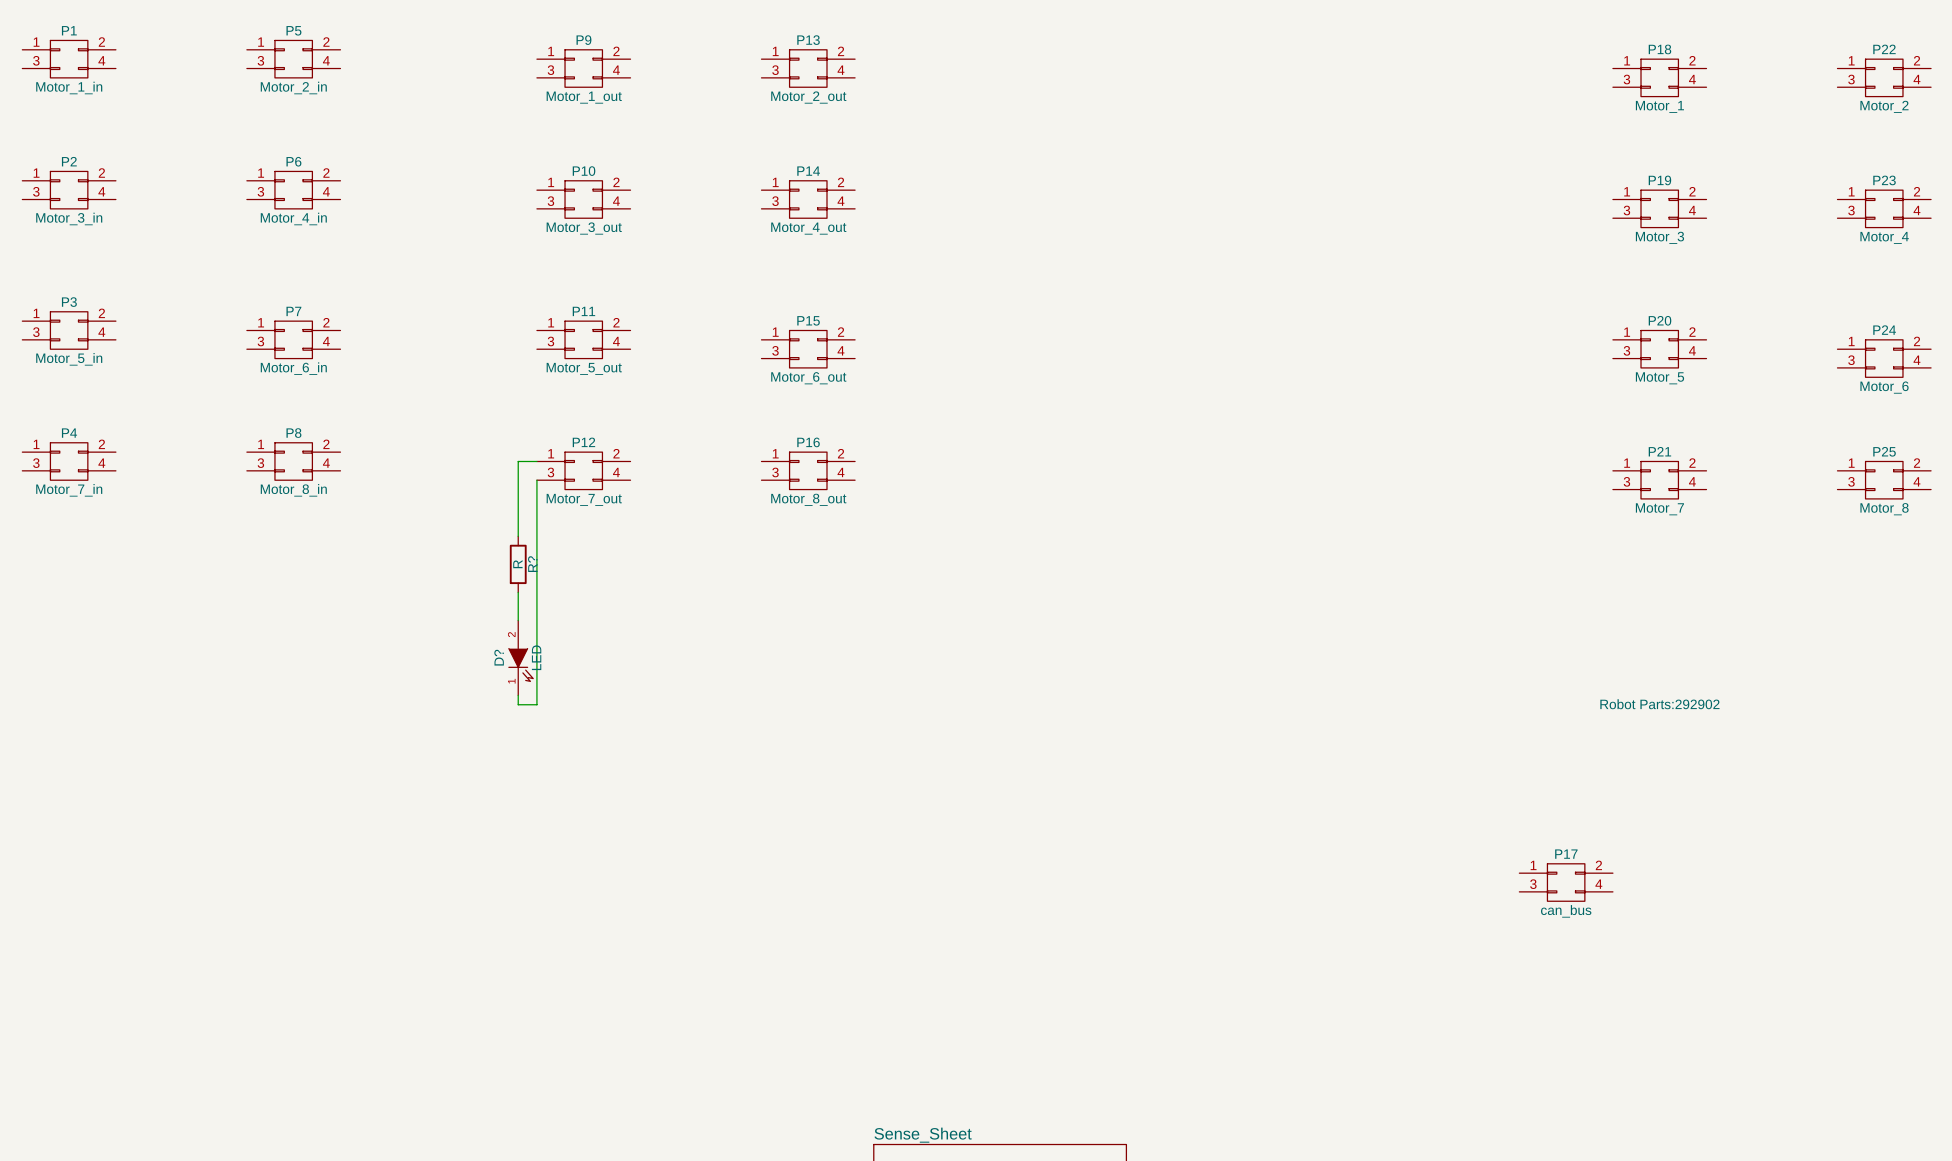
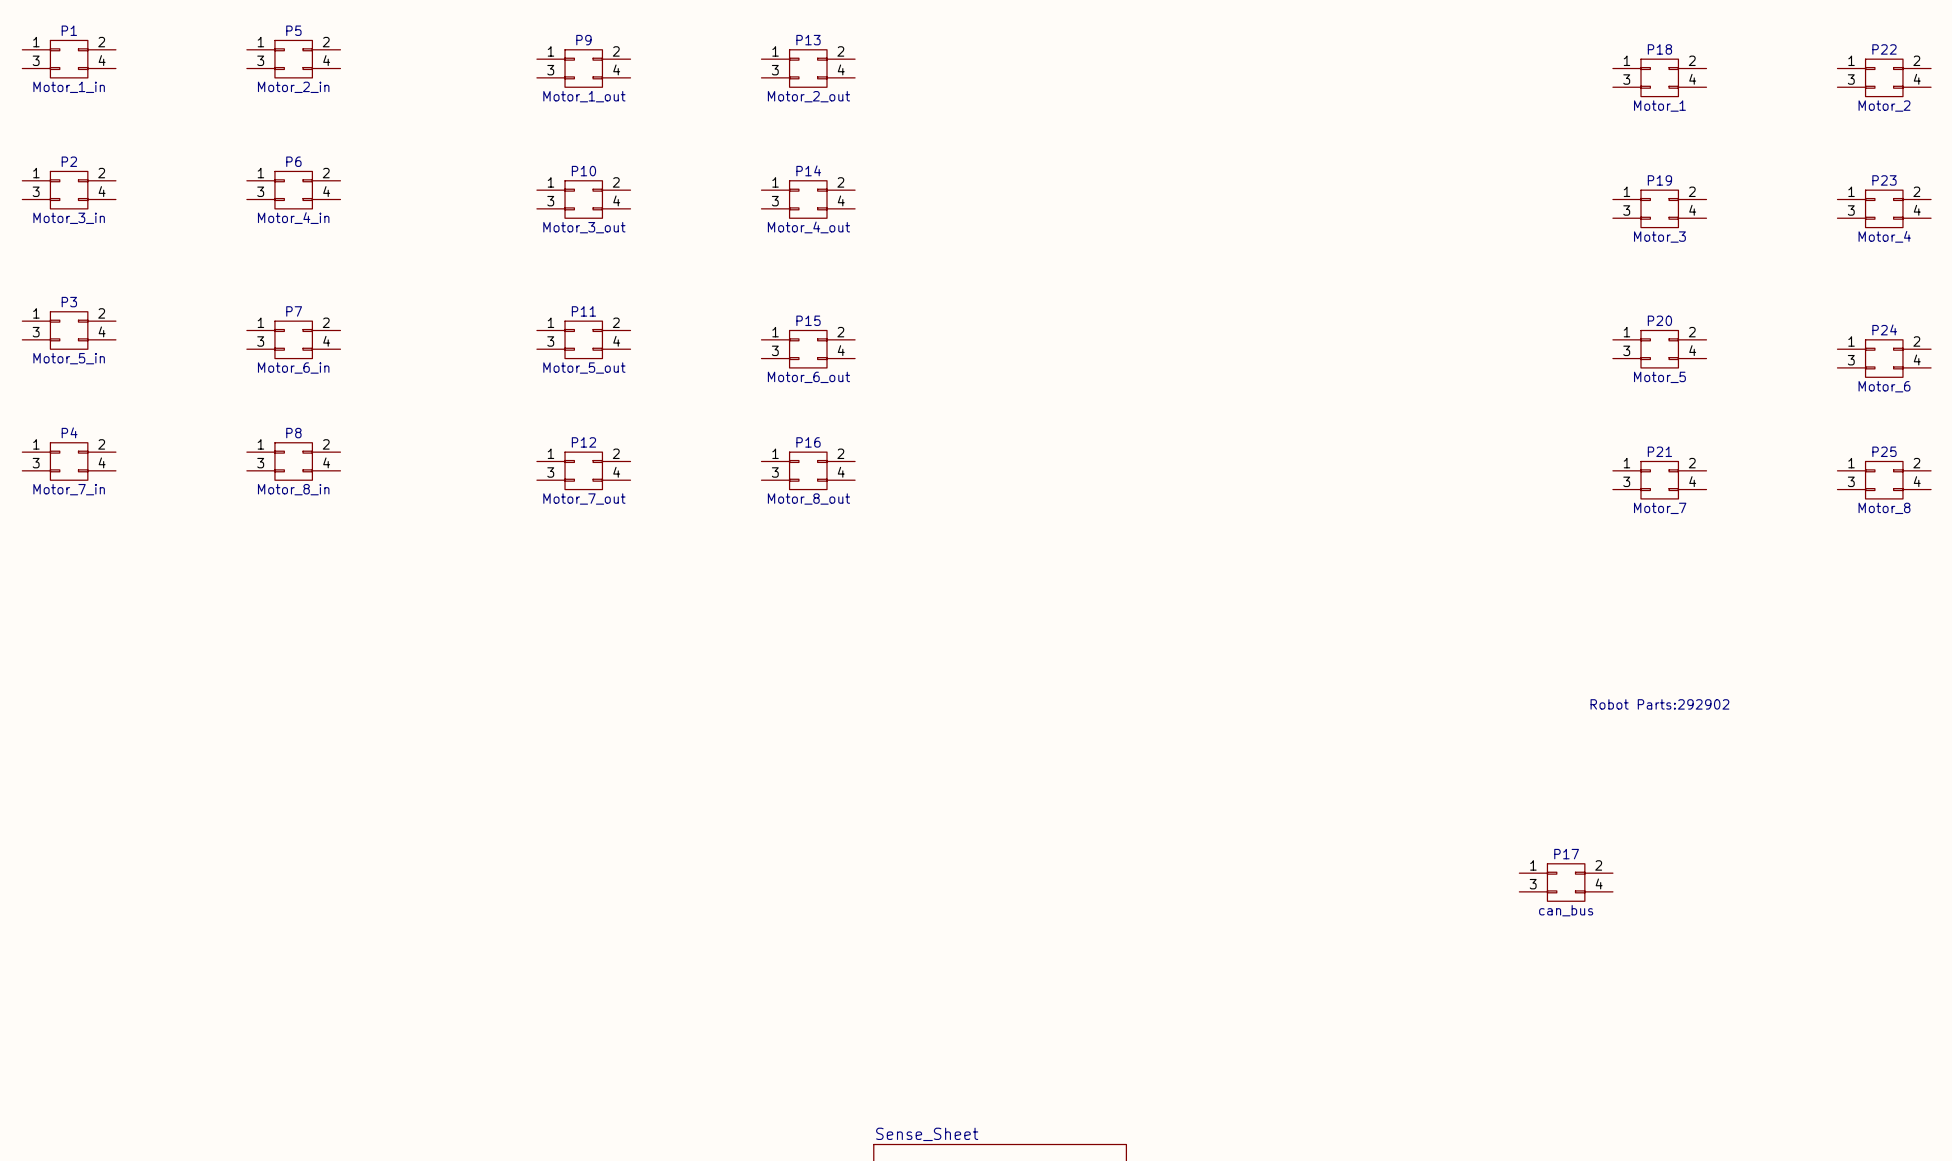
wire: (536, 461) (518, 461) (518, 536) -> none
wire: (536, 480) (536, 704) (518, 704) (518, 695) -> none
R?: R (518, 564) -> none
wire: (518, 592) (518, 620) -> none
D?: LED (521, 657) -> none

